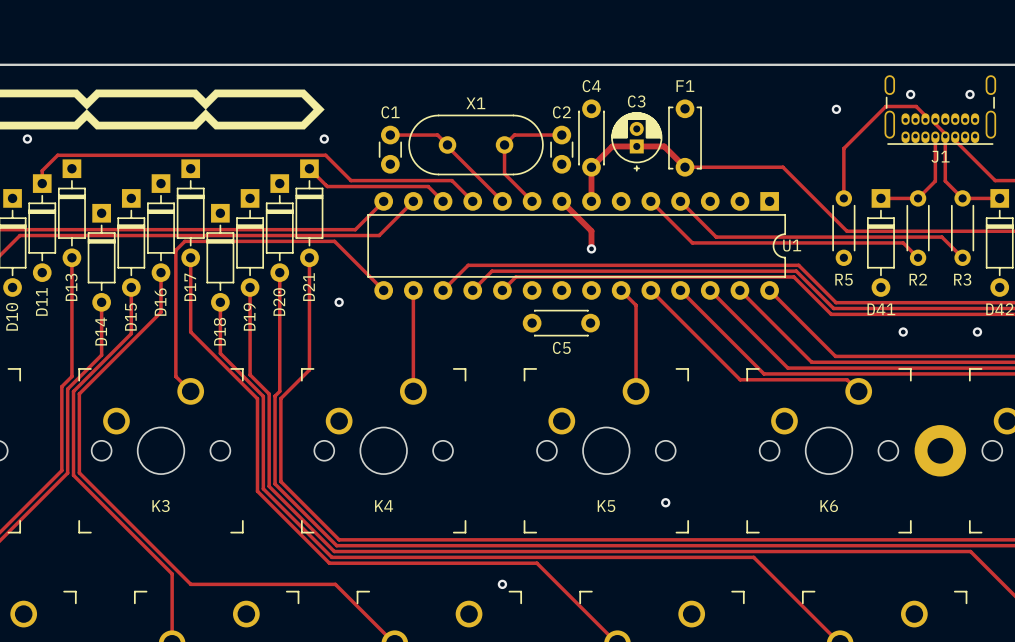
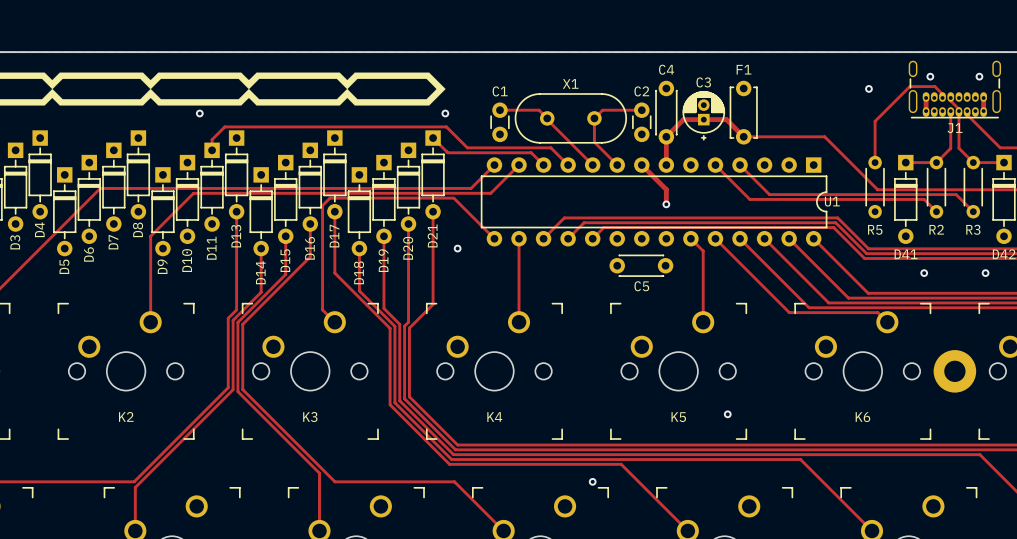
track: none -> (926, 97) (926, 111)
track: none -> (983, 97) (983, 111)

